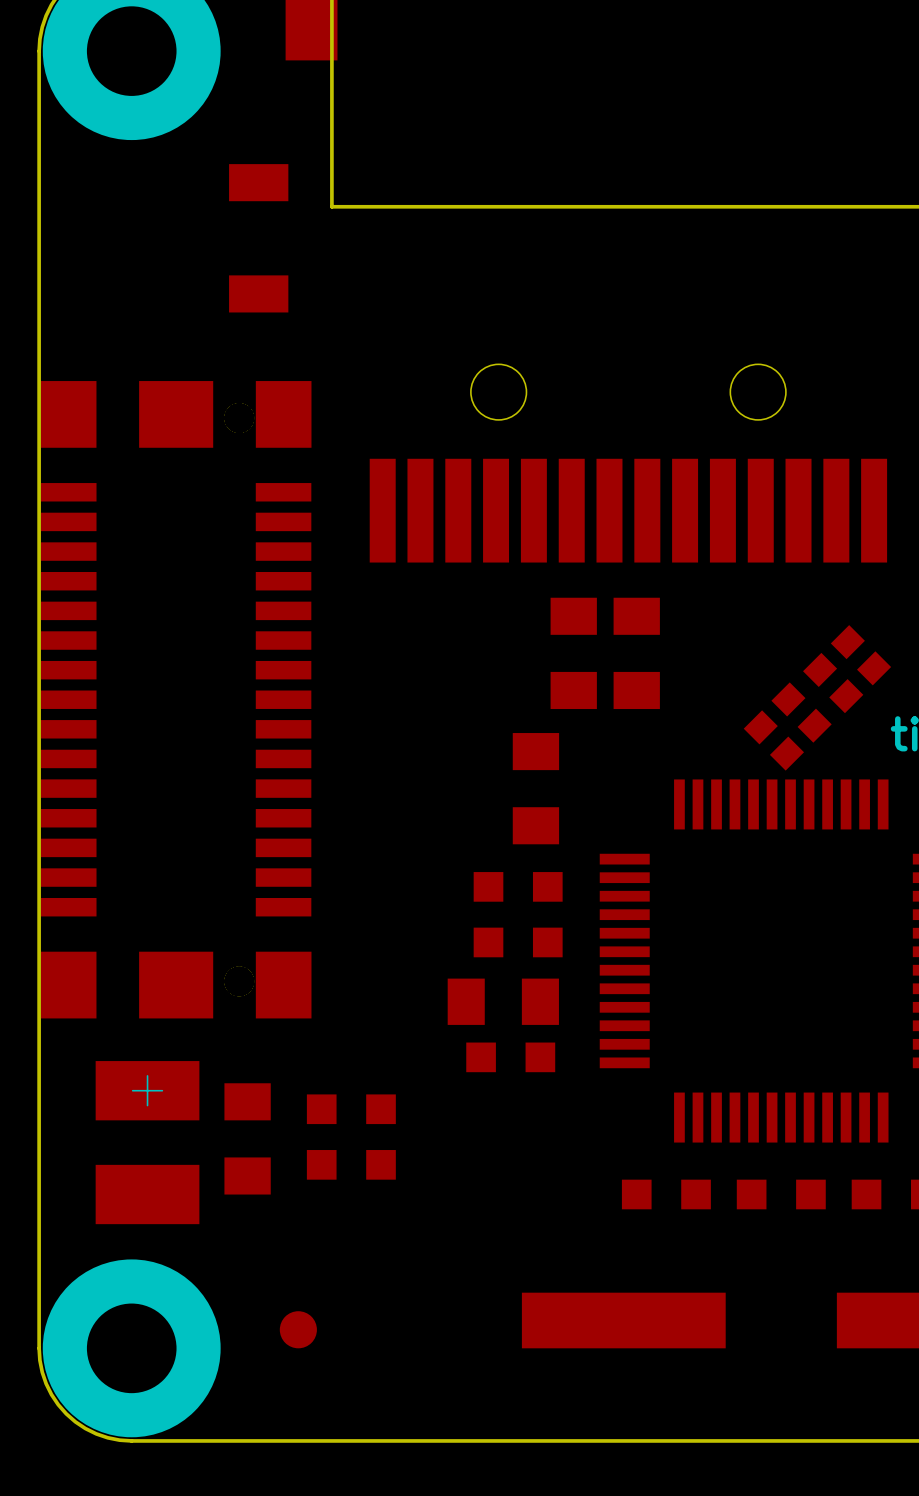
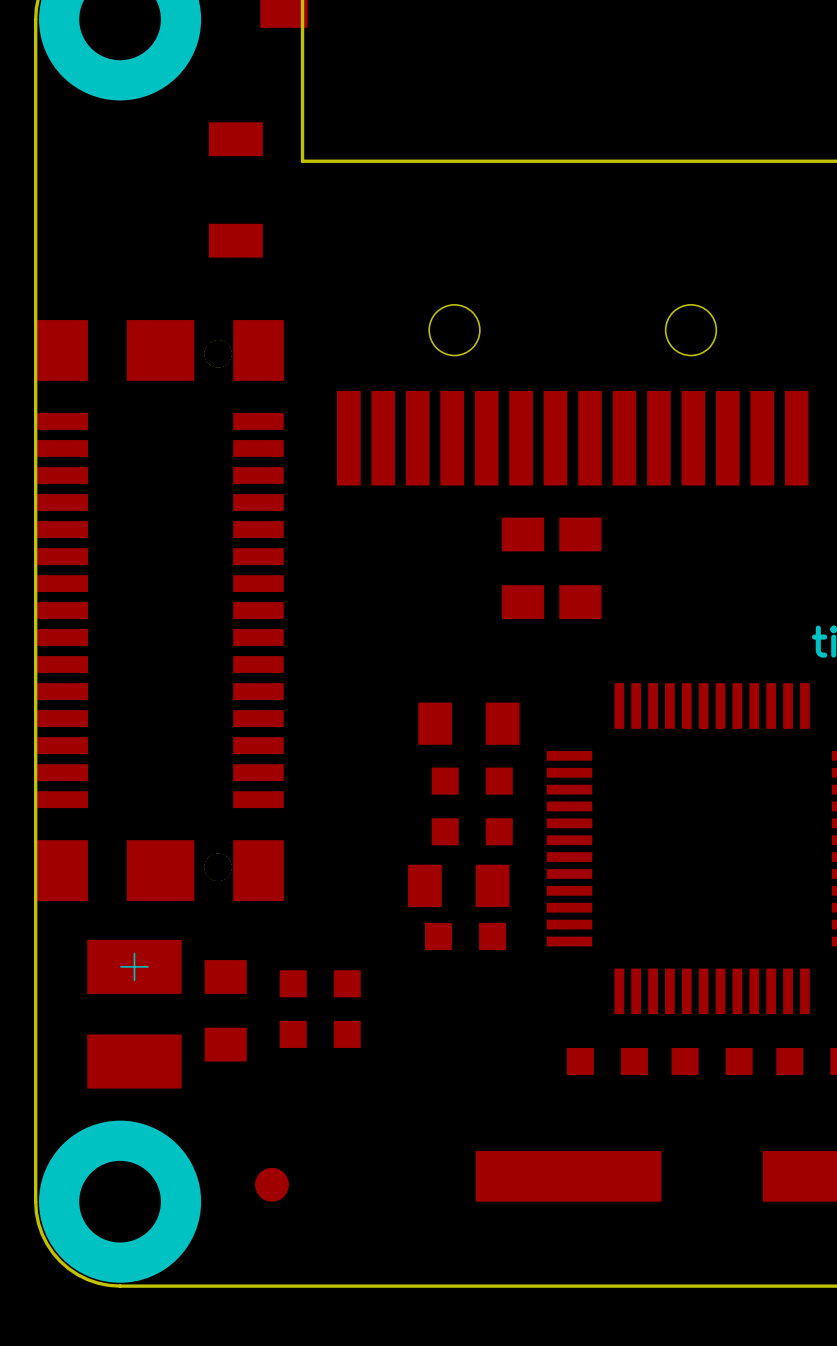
part: (860, 655) -> none
part: (833, 683) -> none
part: (801, 712) -> none
part: (773, 740) -> none
part rotation: 0° (535, 788) -> 90° clockwise (468, 723)

